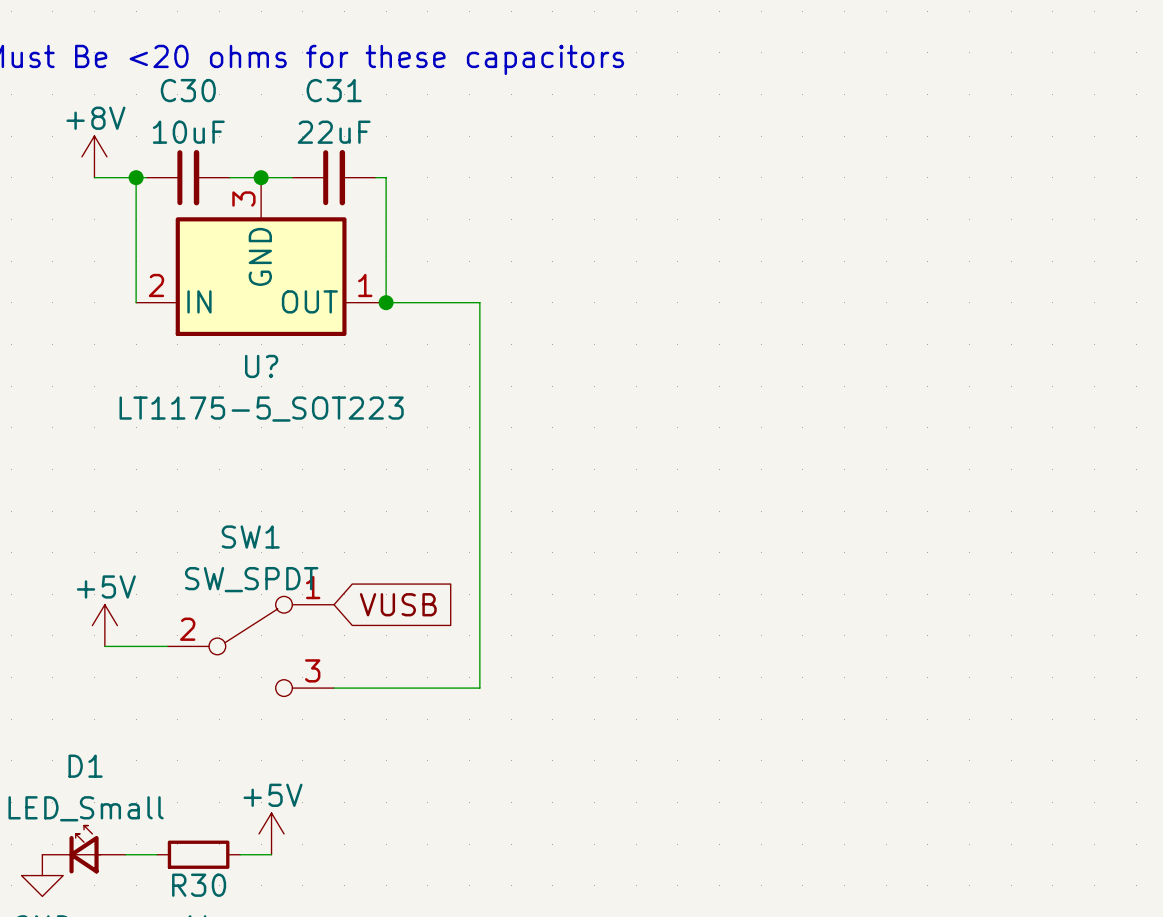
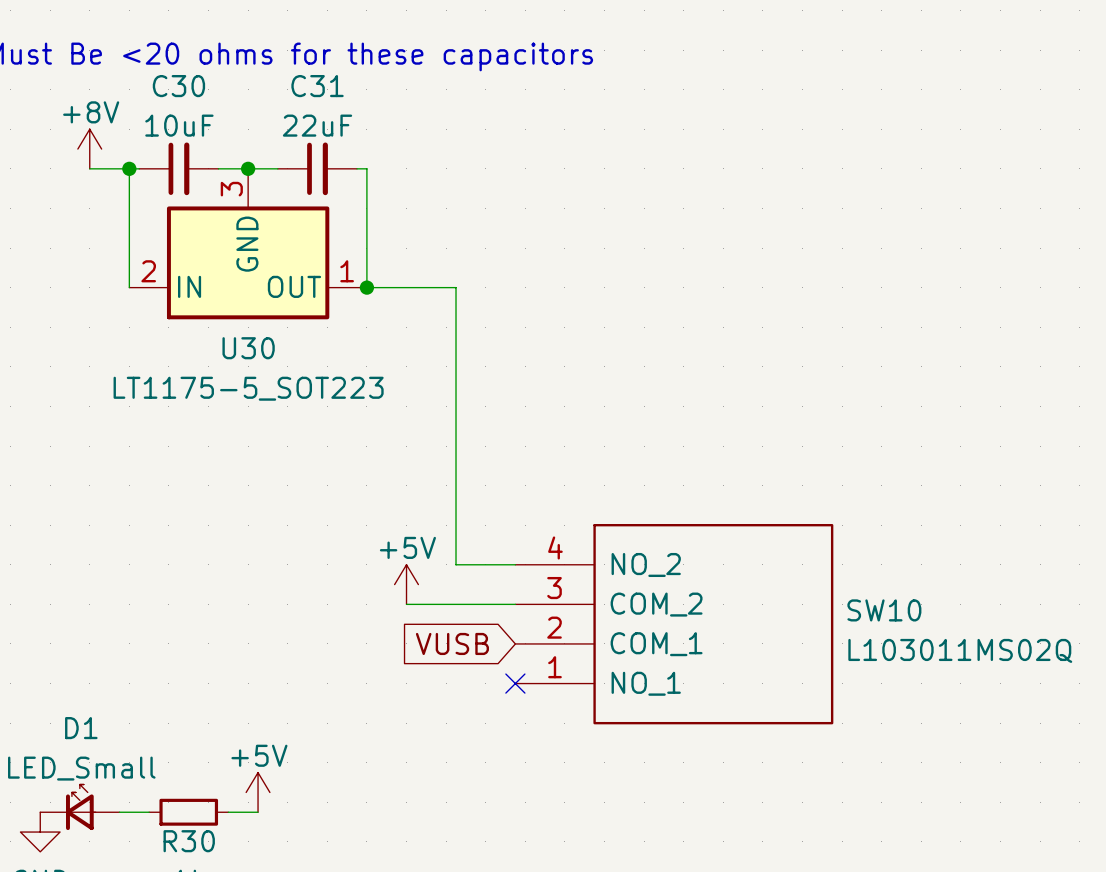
U? name: U? (261, 366) -> U30 (248, 348)
wire: (479, 594) (479, 688) (334, 688) -> (456, 564) (515, 564)
global label rotation: 0° (398, 604) -> 180° (452, 643)
power symbol position: +5V (104, 625) -> +5V (406, 584)
wire: none -> (406, 604) (515, 604)
wire: (104, 646) (167, 646) -> none
SW1: SW_SPDT (250, 646) -> none
SW10: none -> L103011MS02Q (674, 624)
no-connect mark: none -> (515, 683)

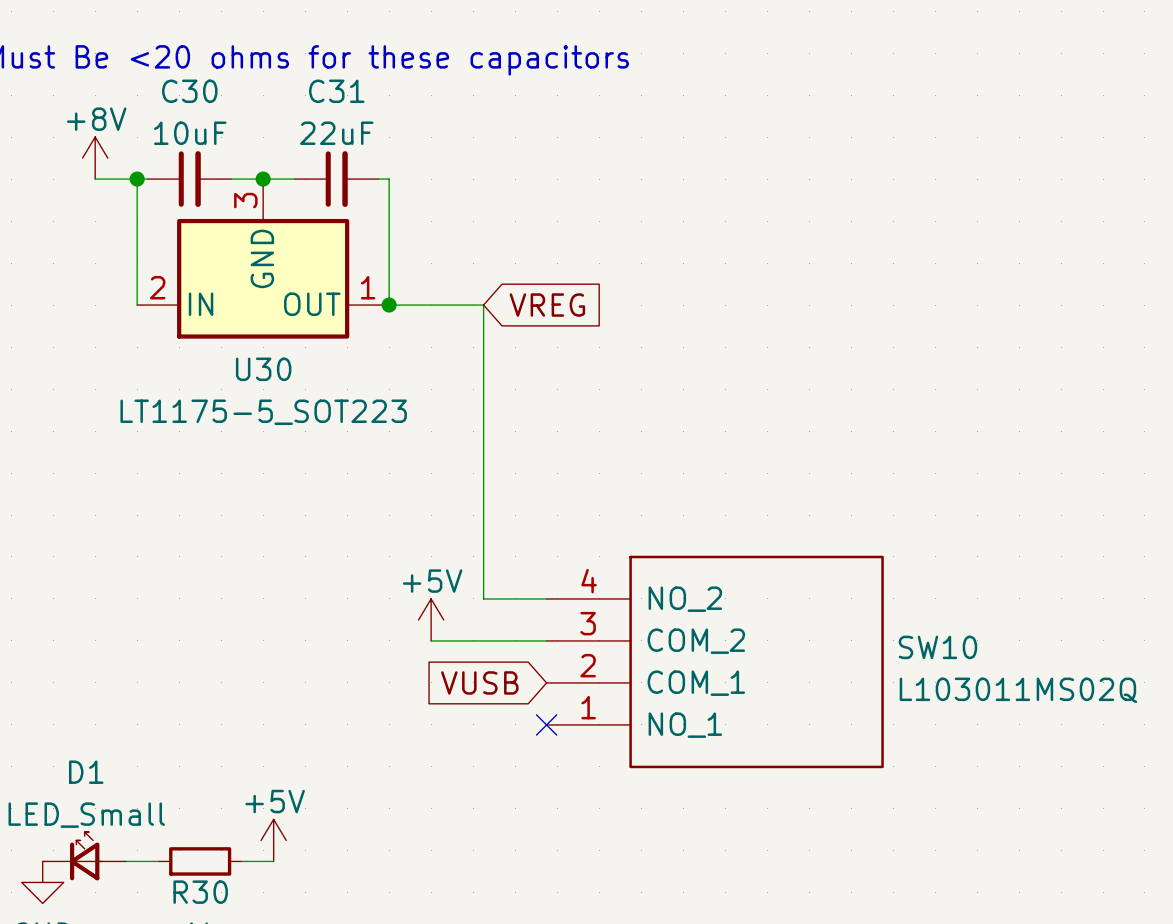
global label: none -> VREG (547, 305)

